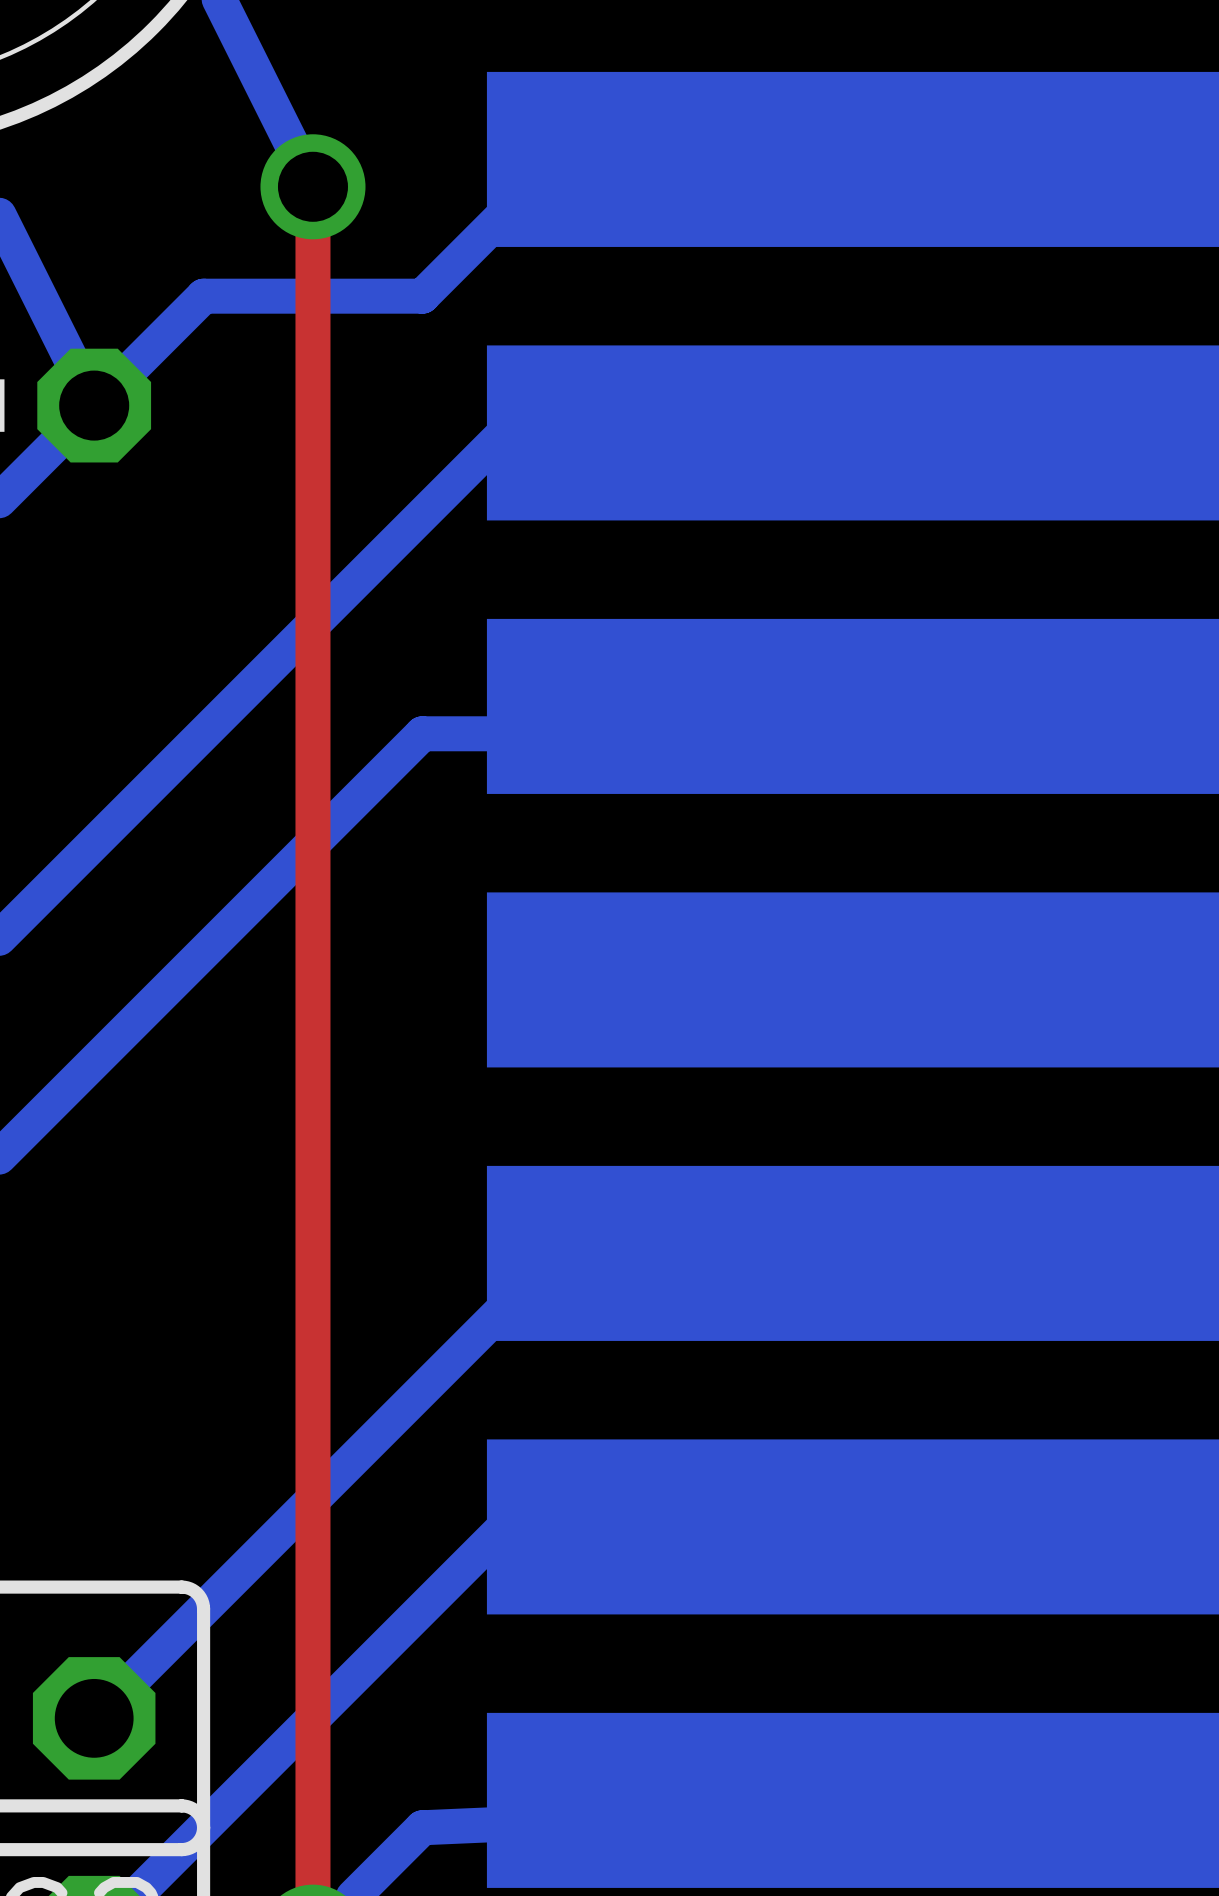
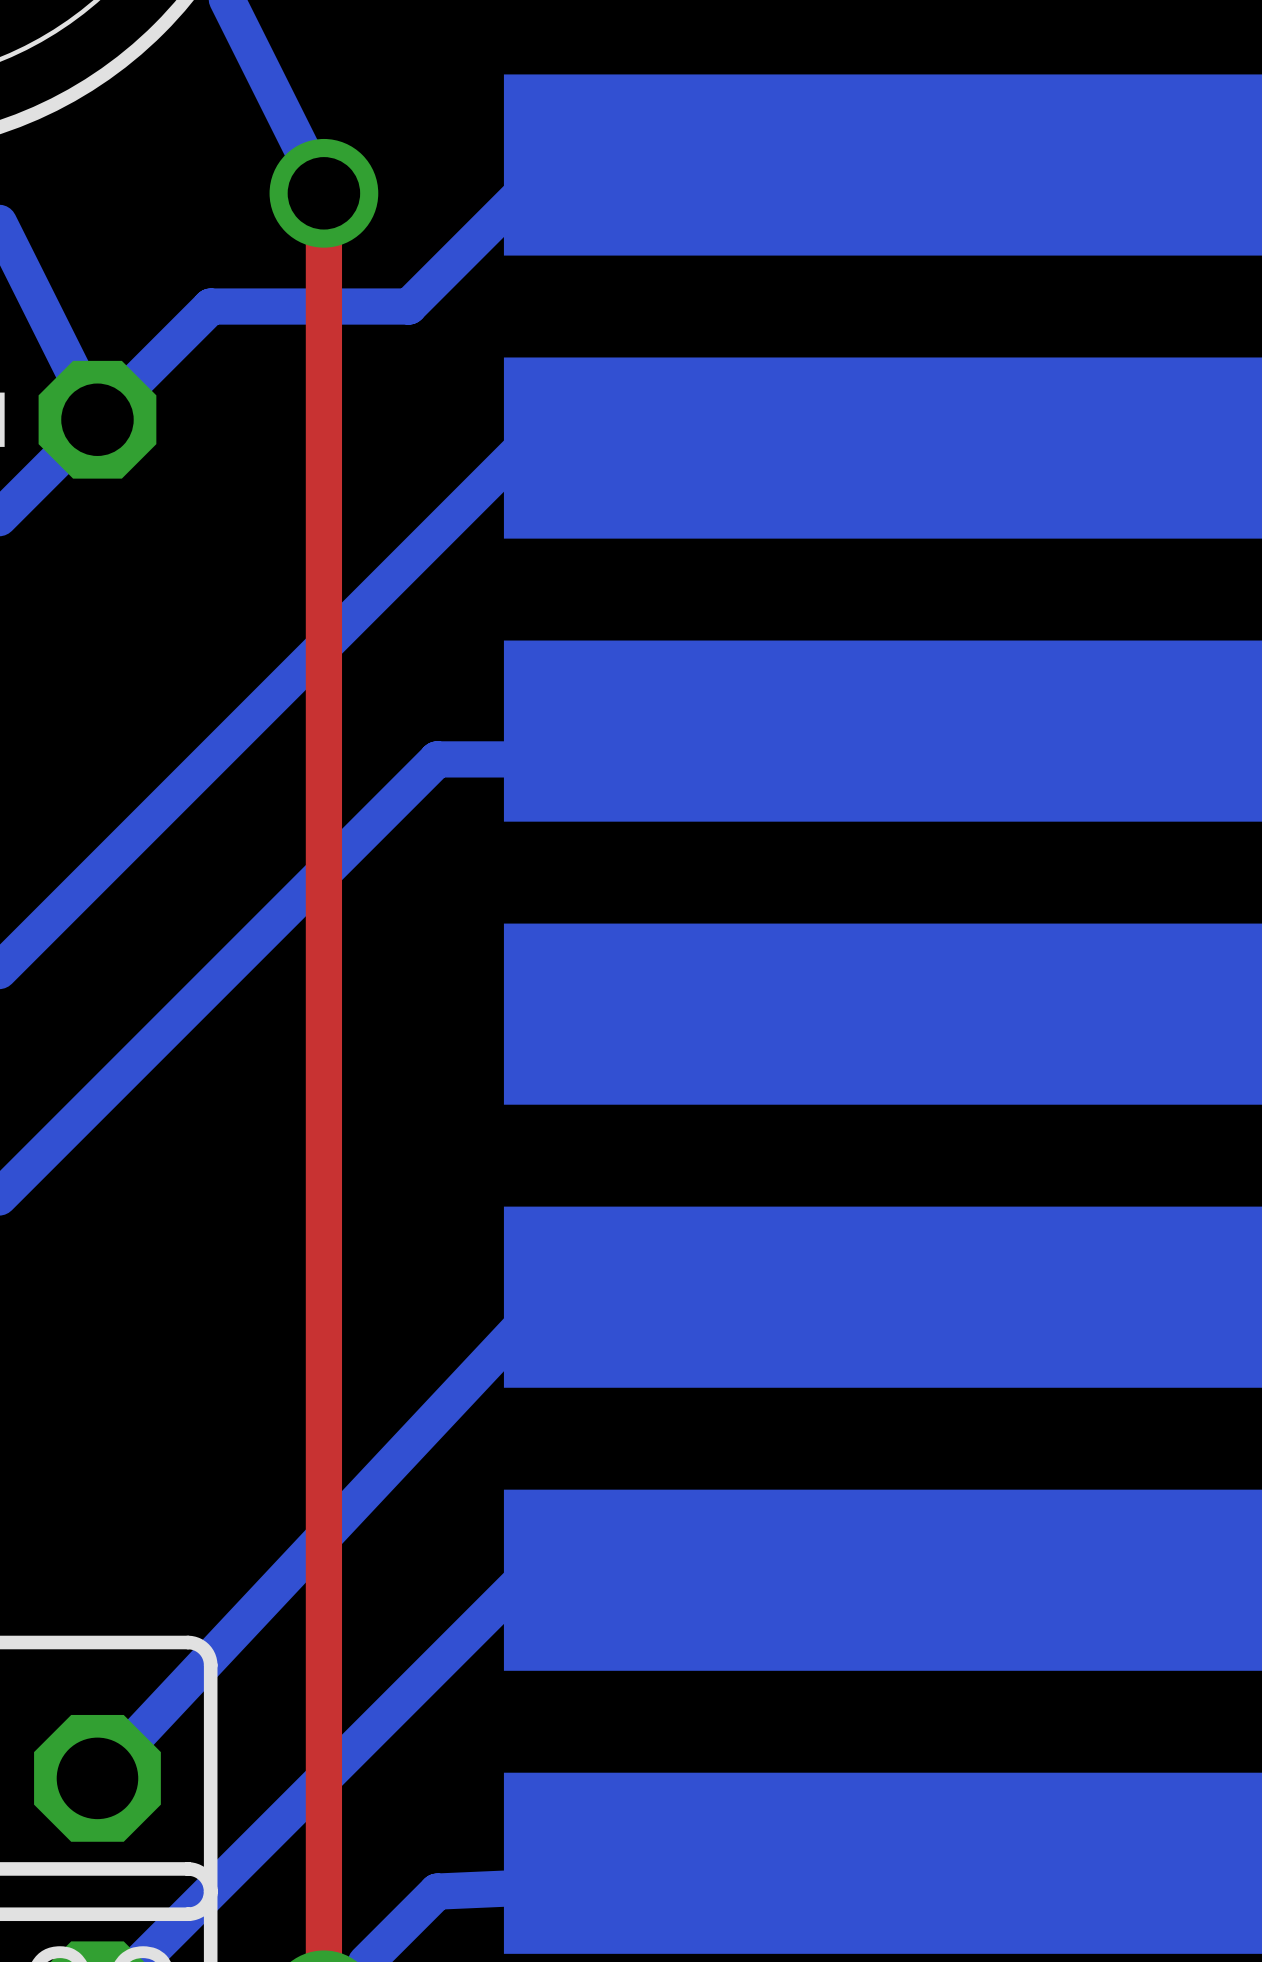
bottom track: (531, 186) (422, 296) (395, 296) -> (550, 193) (522, 193) (408, 306)
bottom track: (531, 1280) (94, 1718) -> (550, 1325) (522, 1325) (97, 1778)

